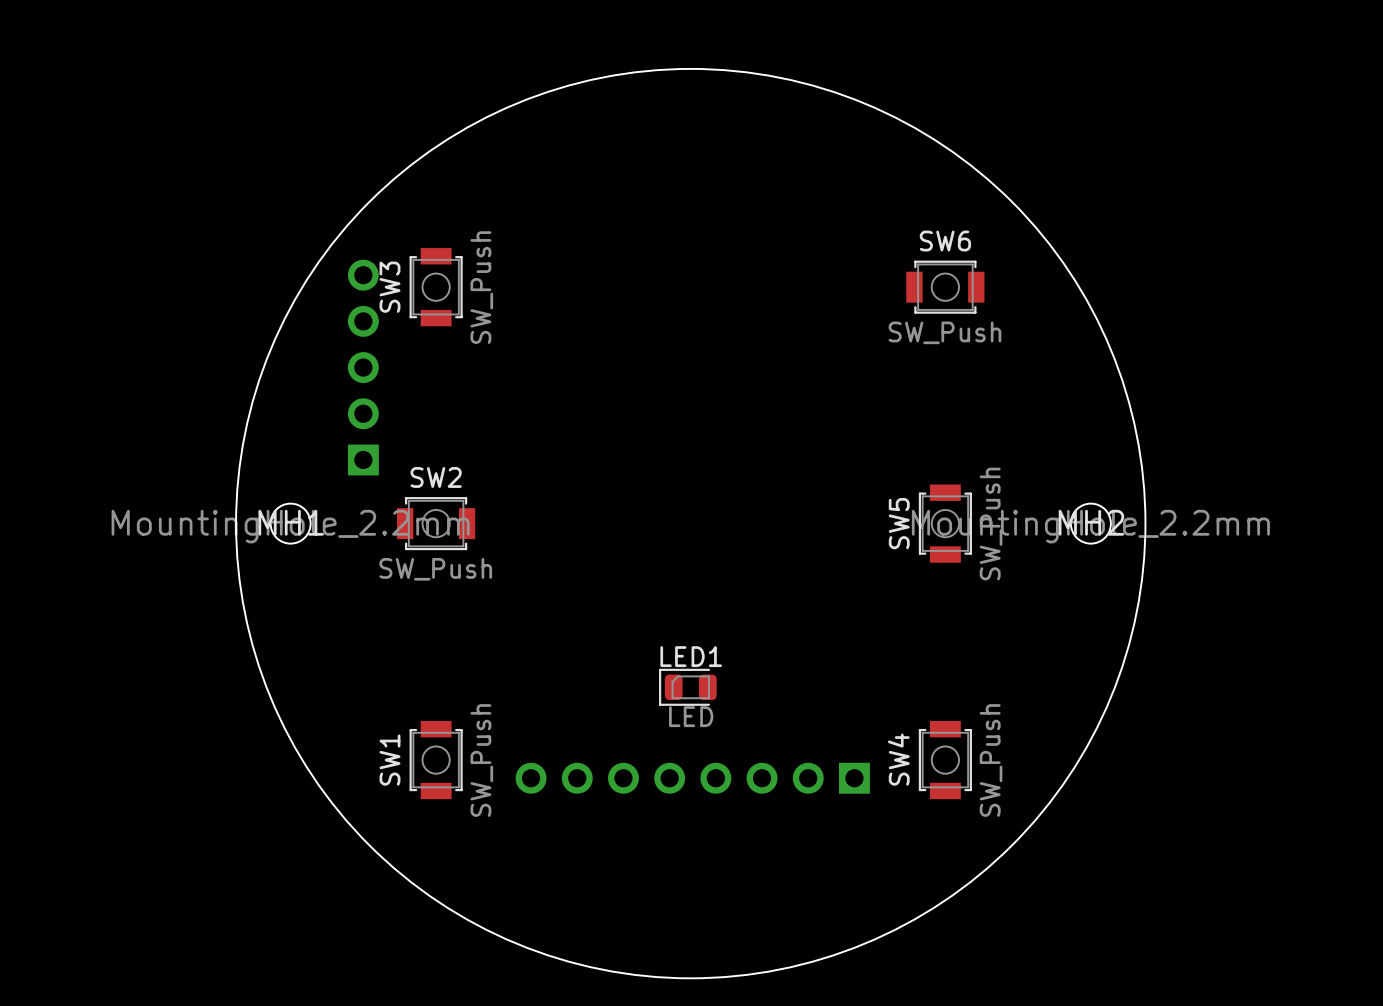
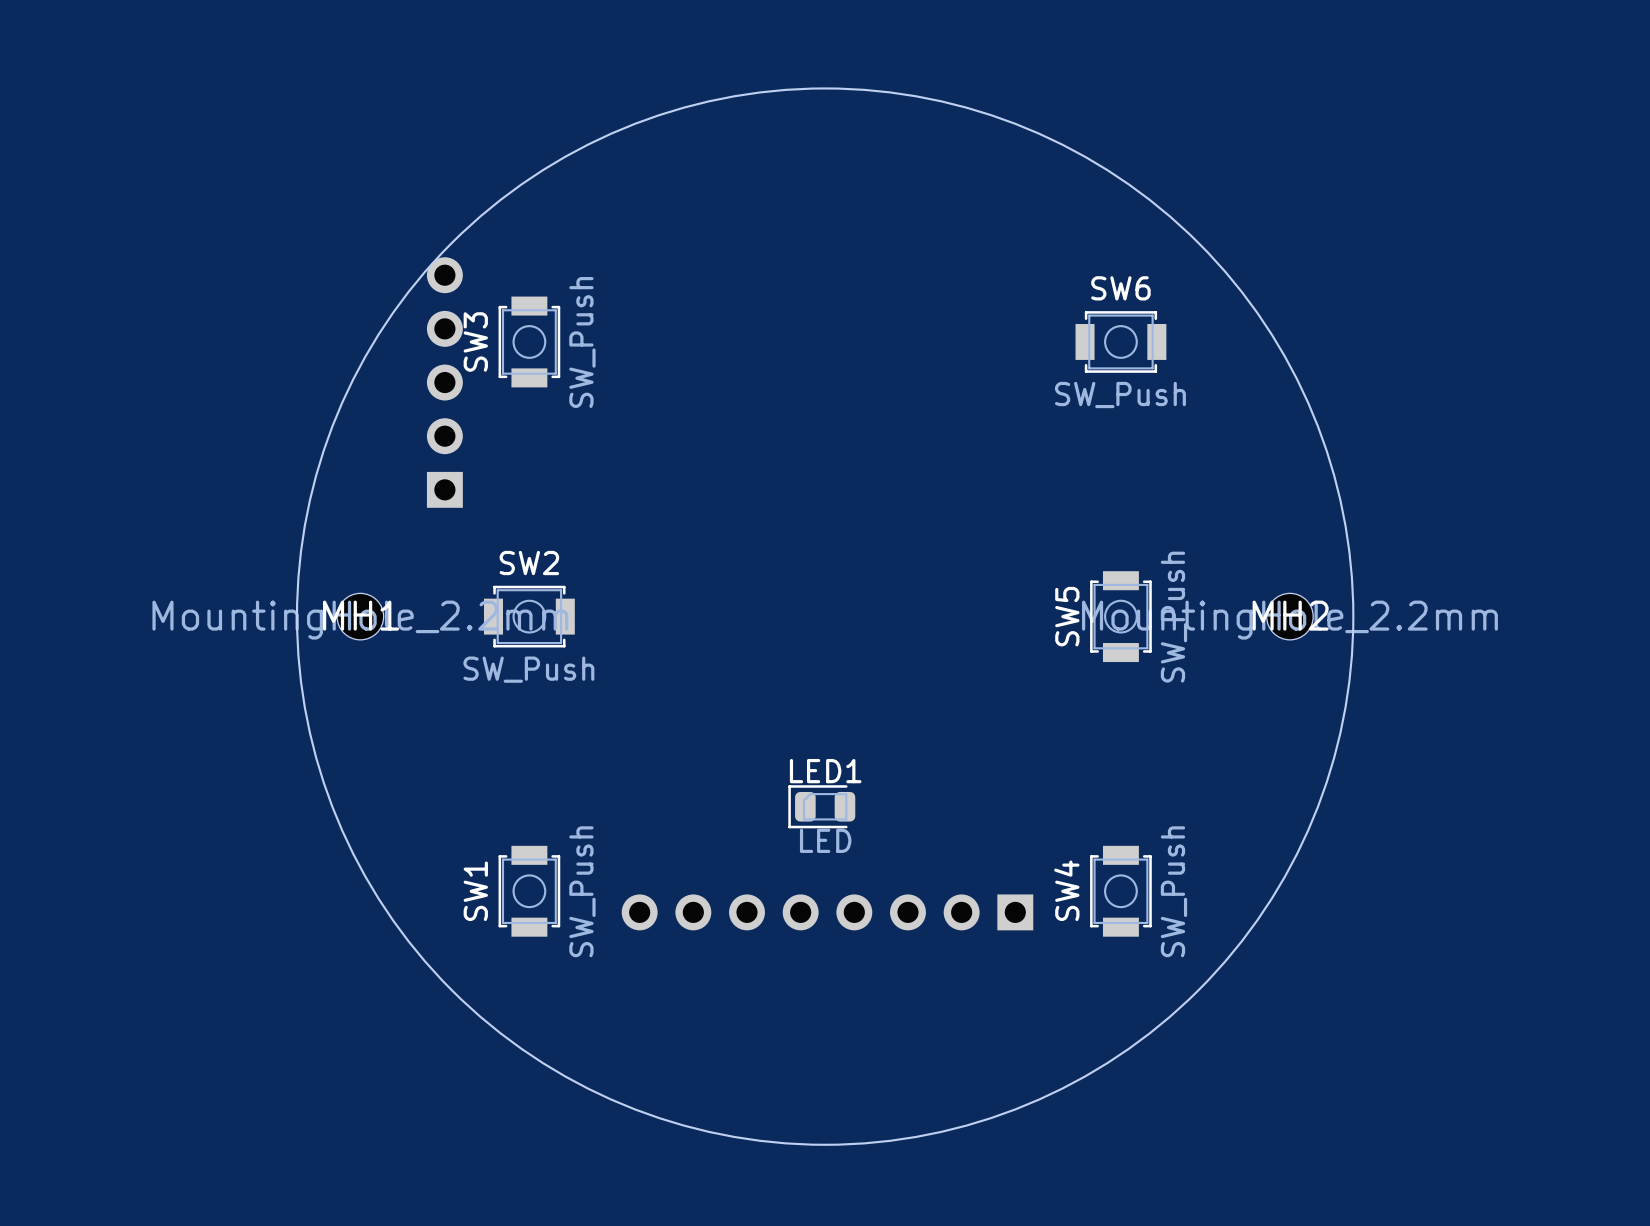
part position: (363, 367) -> (444, 382)

